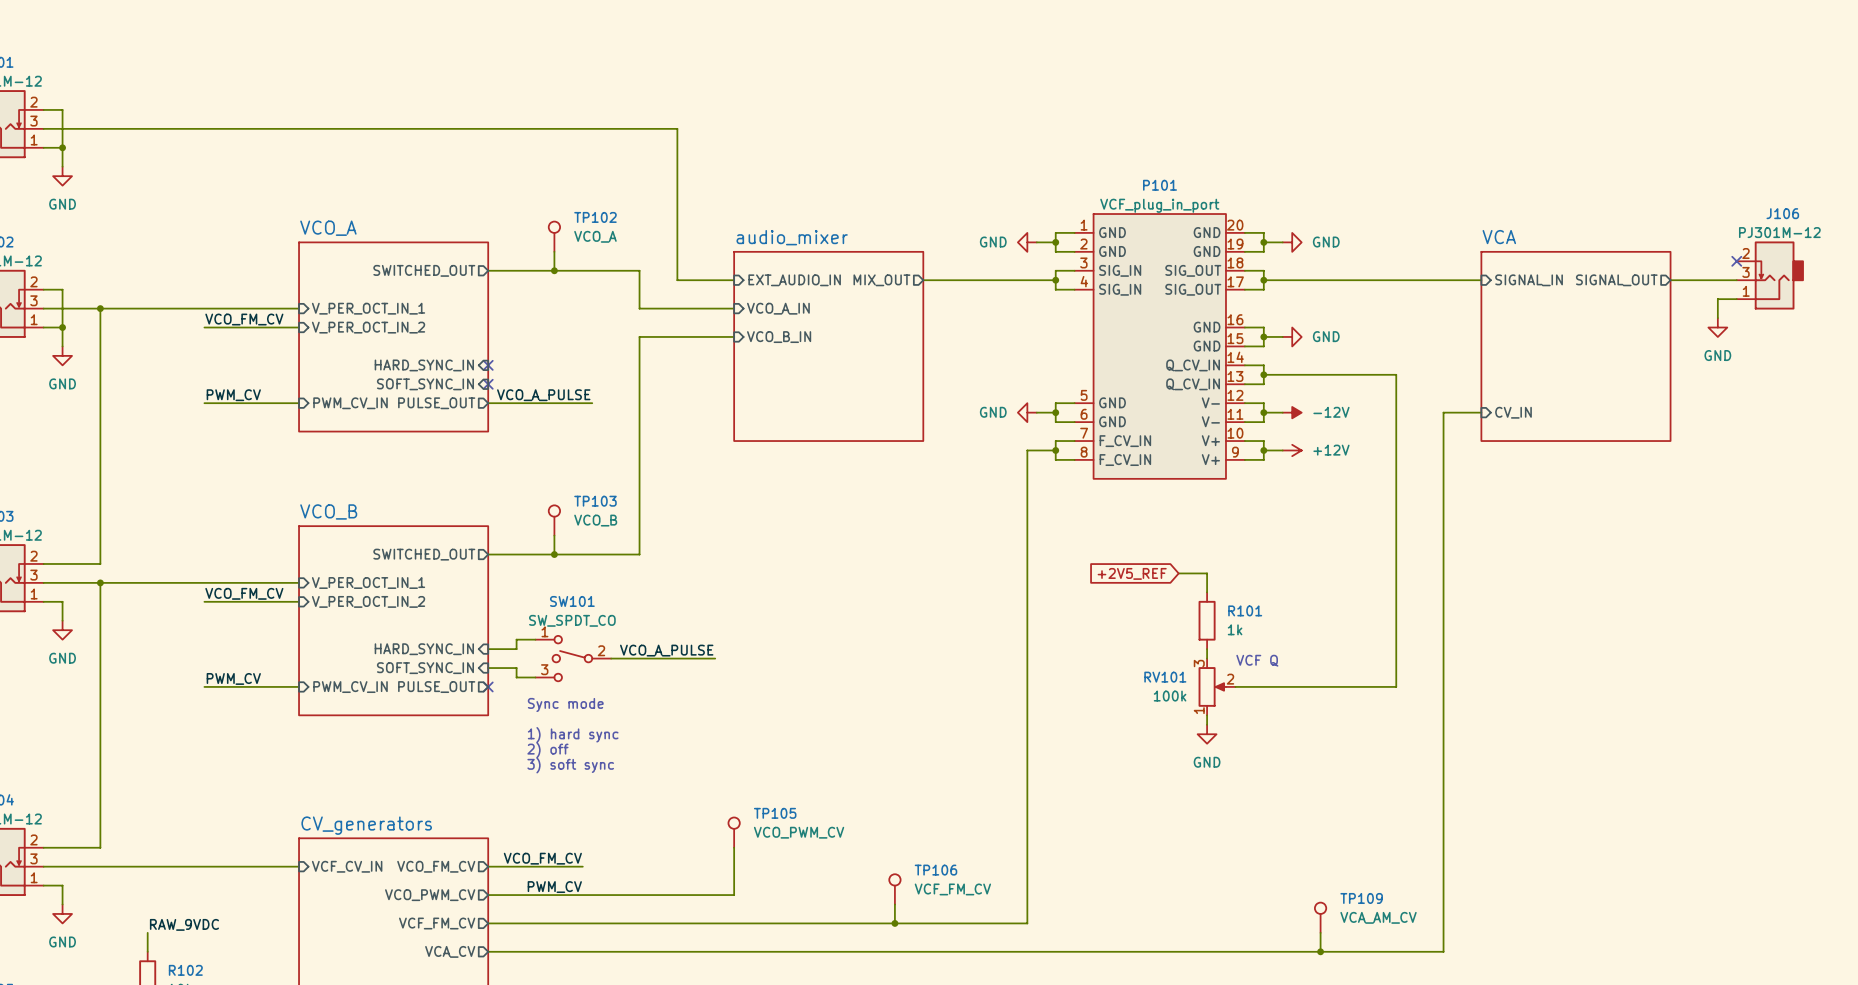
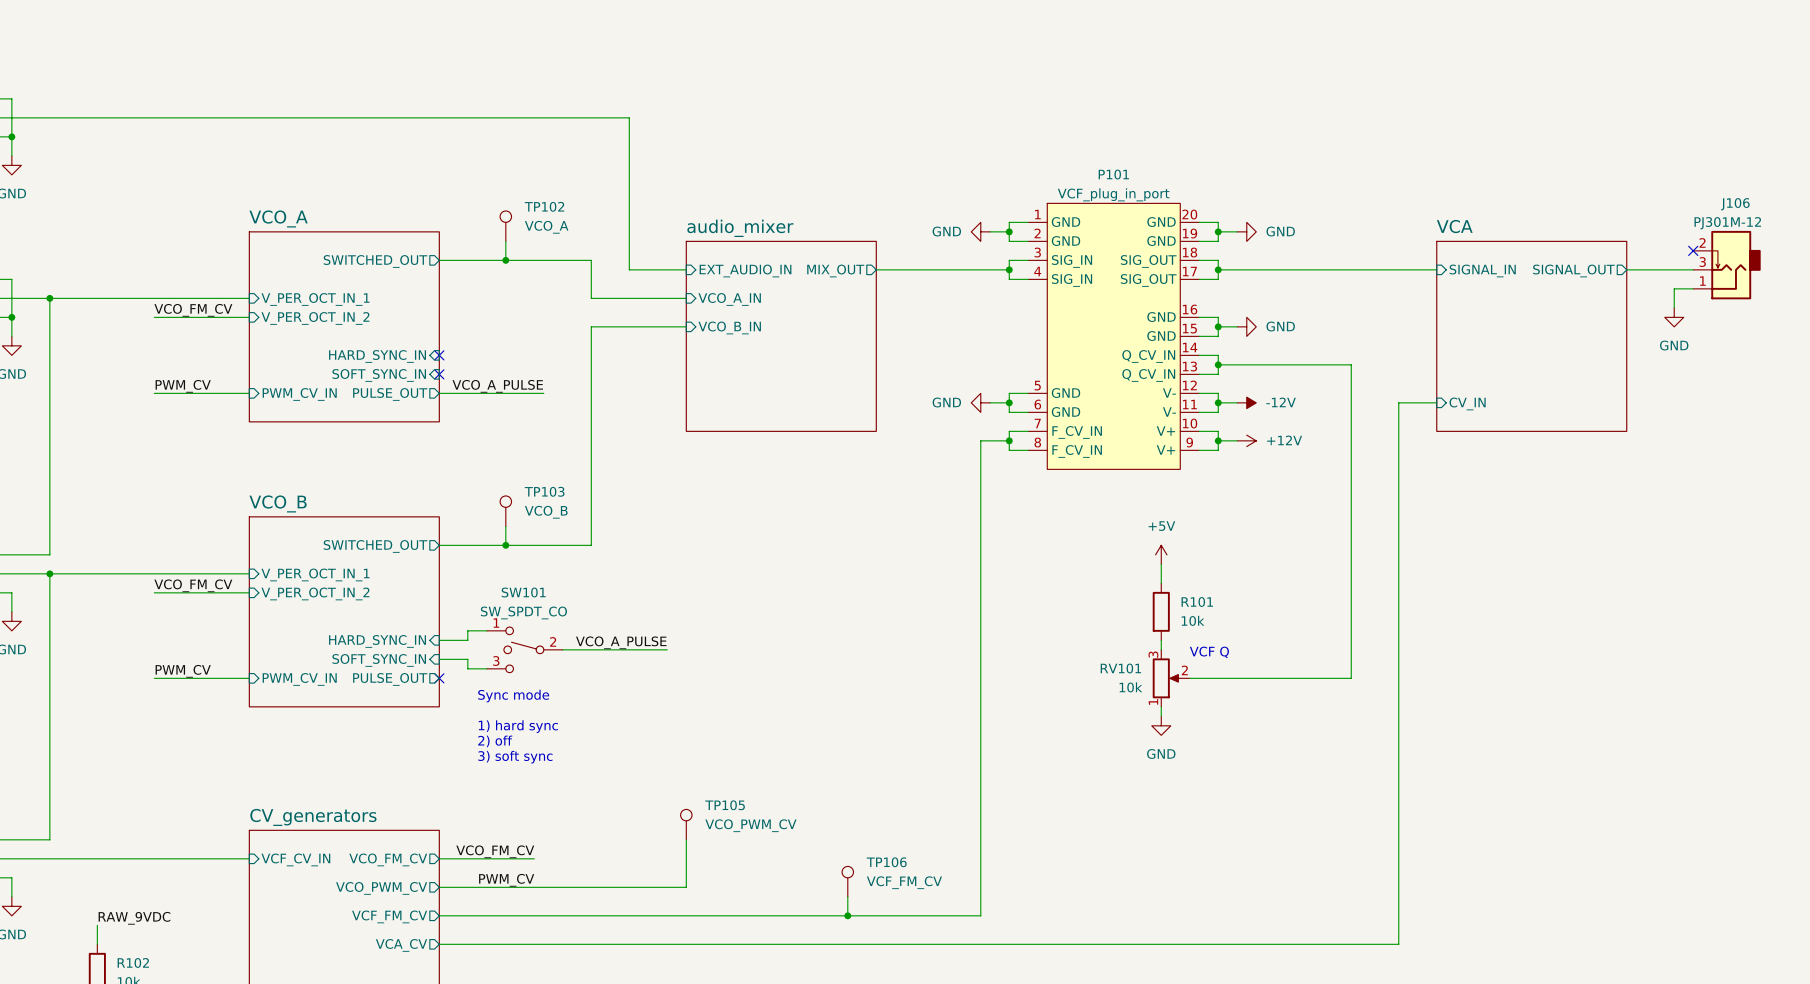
power symbol: none -> +5V (1161, 554)
global label: +2V5_REF (1132, 573) -> none
wire: (1178, 573) (1207, 573) -> none
R101 value: 1k (1235, 629) -> 10k (1193, 620)
RV101 value: 100k (1170, 696) -> 10k (1130, 687)
TP109: VCA_AM_CV (1320, 917) -> none
wire: (1320, 932) (1320, 951) -> none
junction: (1320, 951) -> none

